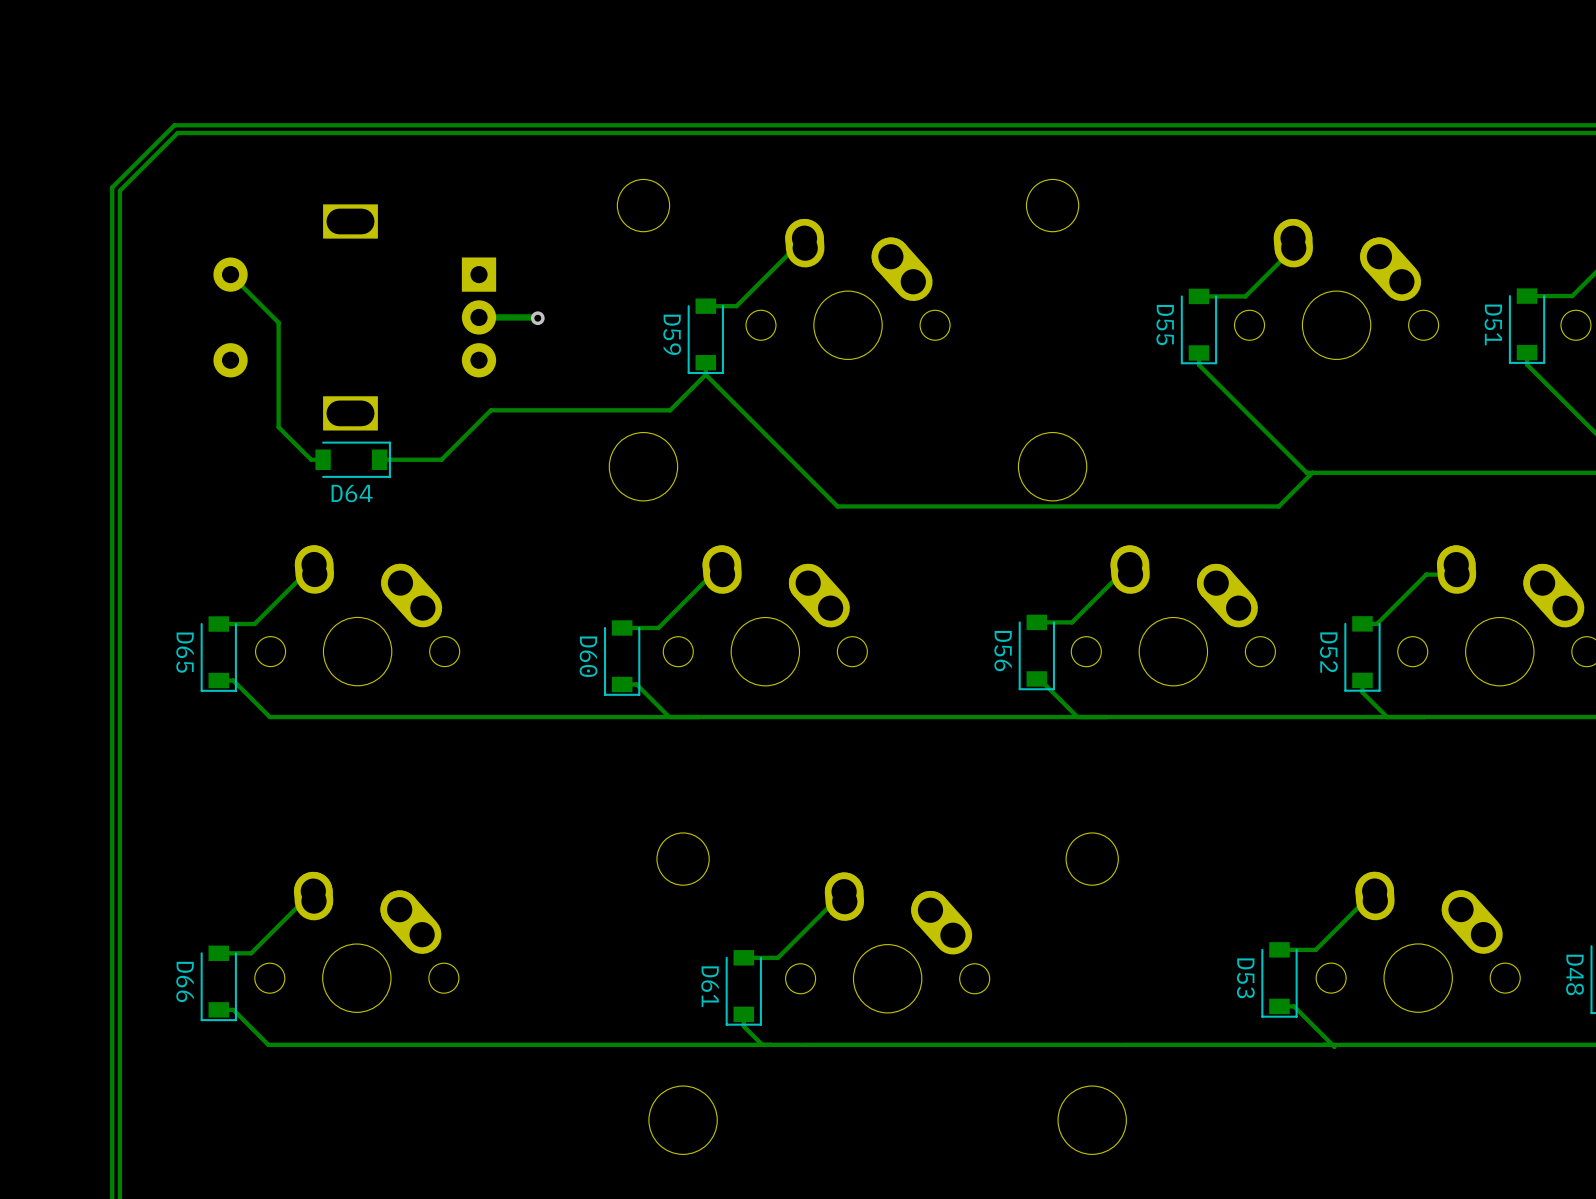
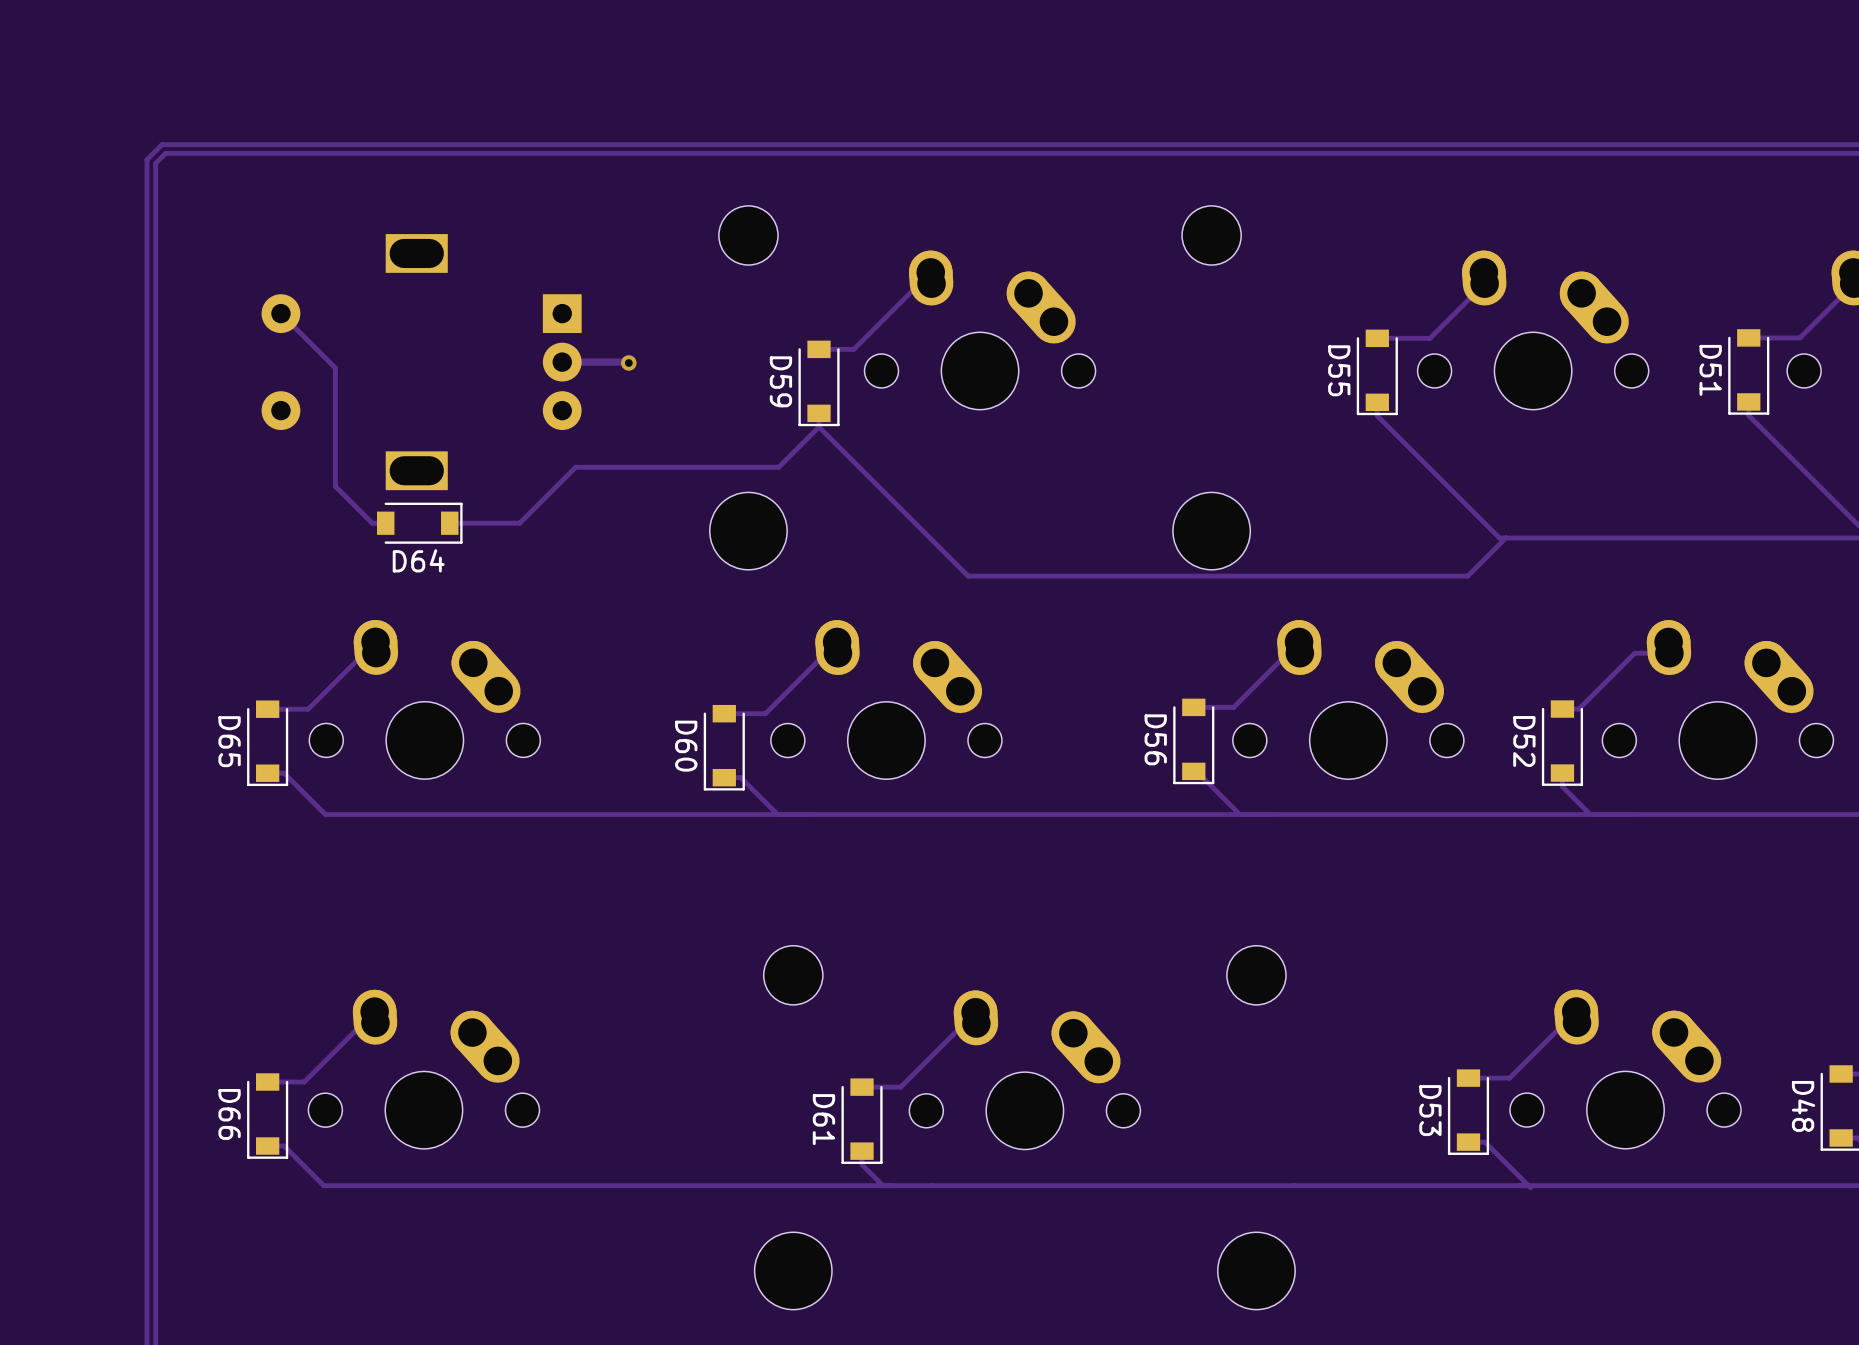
track: (174, 125) (112, 187) -> (217, 144) (162, 144) (146, 159) (146, 215)
track: (177, 133) (119, 190) -> (221, 153) (165, 153) (155, 163) (155, 218)

